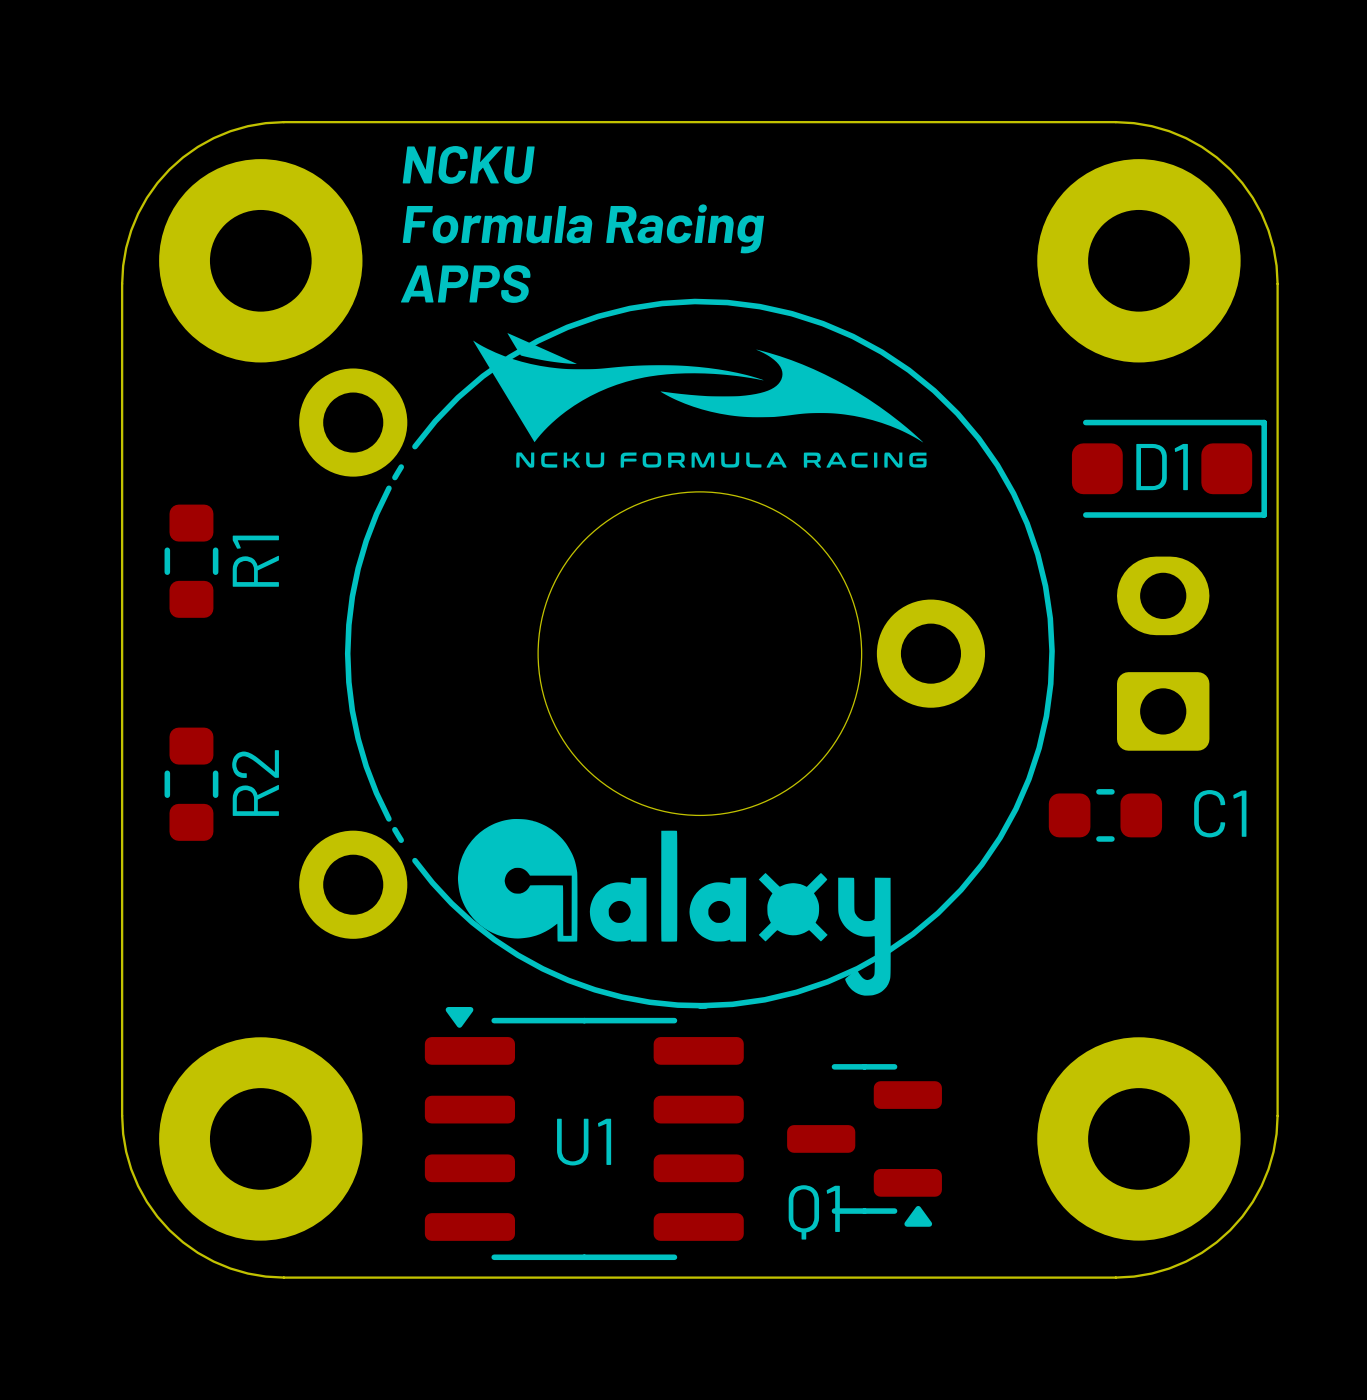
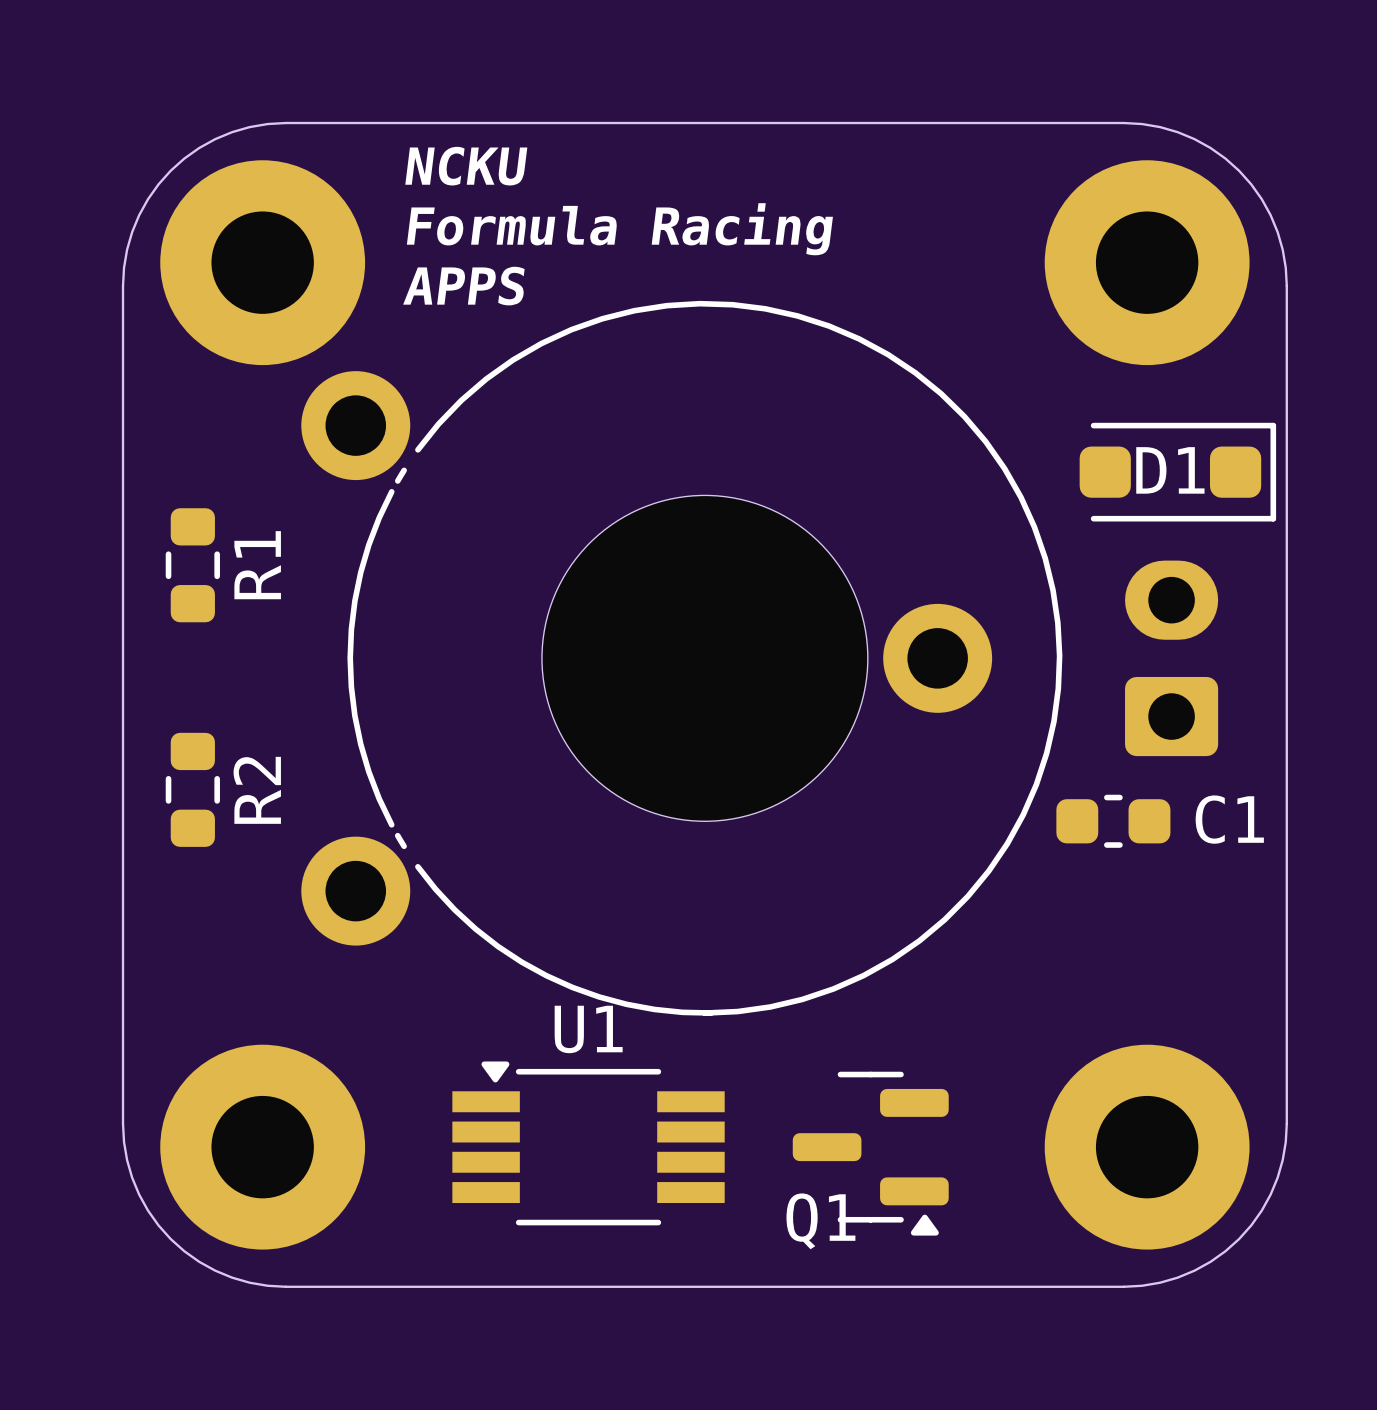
drawing: [473, 333, 927, 468] -> none
drawing: [457, 819, 891, 996] -> none
U1 footprint: [424, 1006, 744, 1261] -> [452, 1061, 725, 1226]
U1 name position: U1 (584, 1142) -> U1 (588, 1029)

